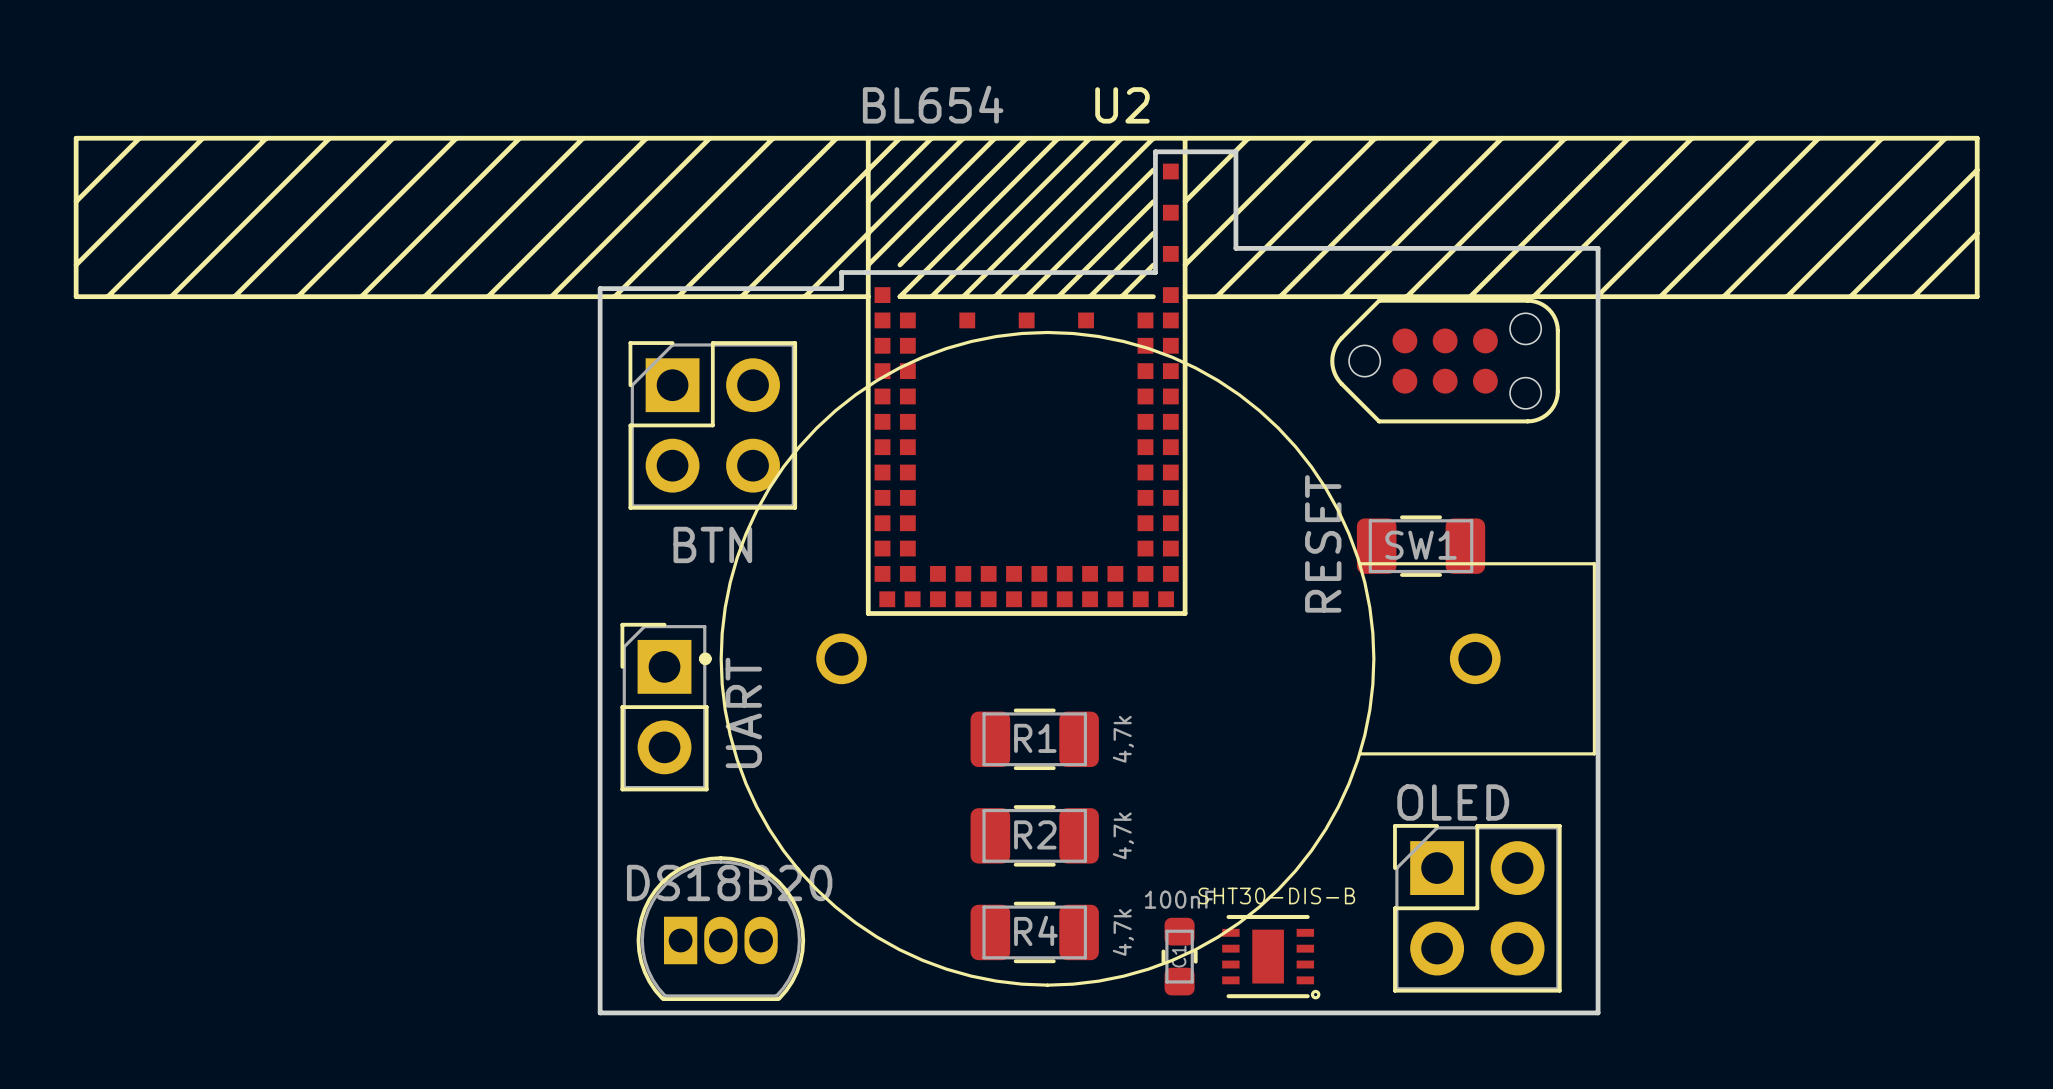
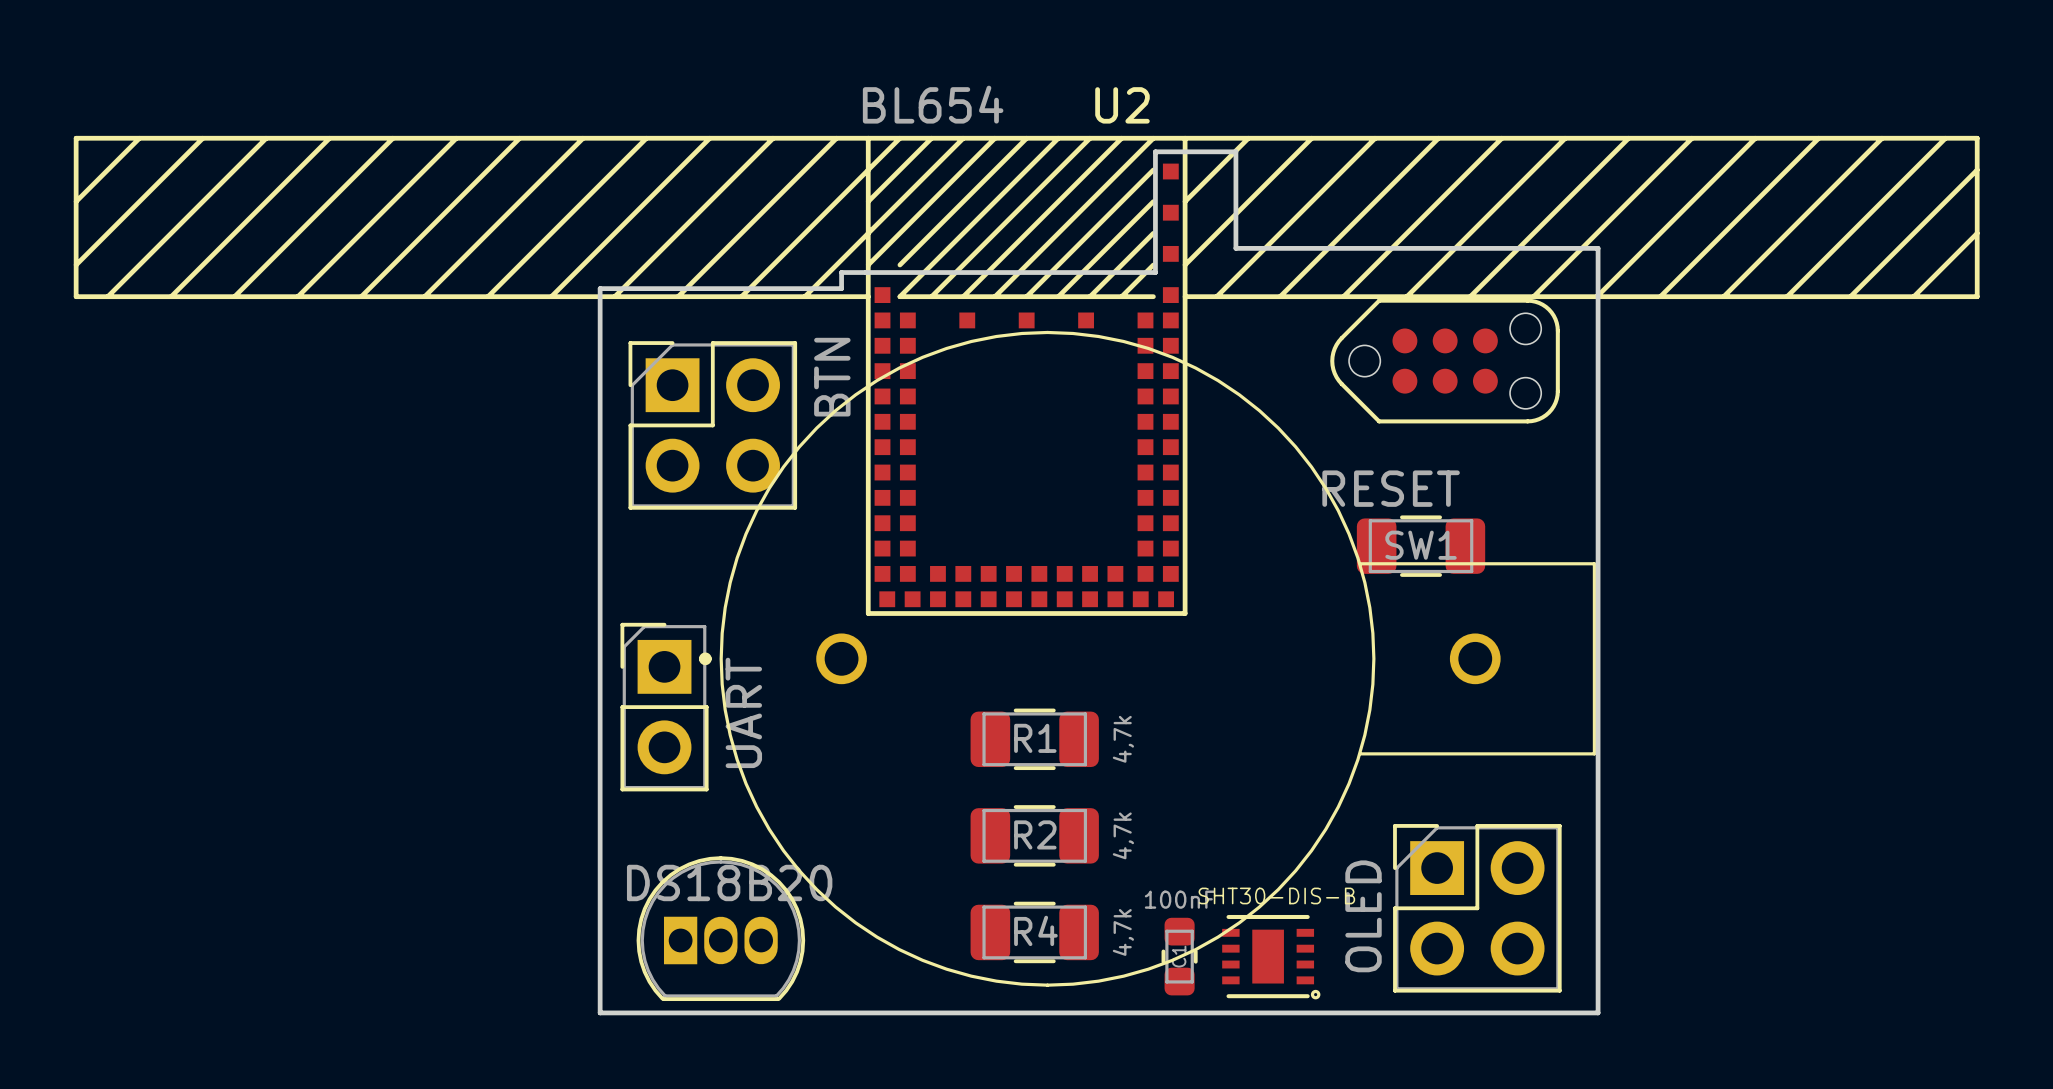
SW1 value rotation: 0° (1323, 543) -> 90° clockwise (1391, 488)
part value rotation: 0° (712, 544) -> 90° counterclockwise (832, 377)
part value position: BTN (712, 544) -> BTN (832, 377)
part value rotation: 0° (1453, 802) -> 90° counterclockwise (1363, 916)

